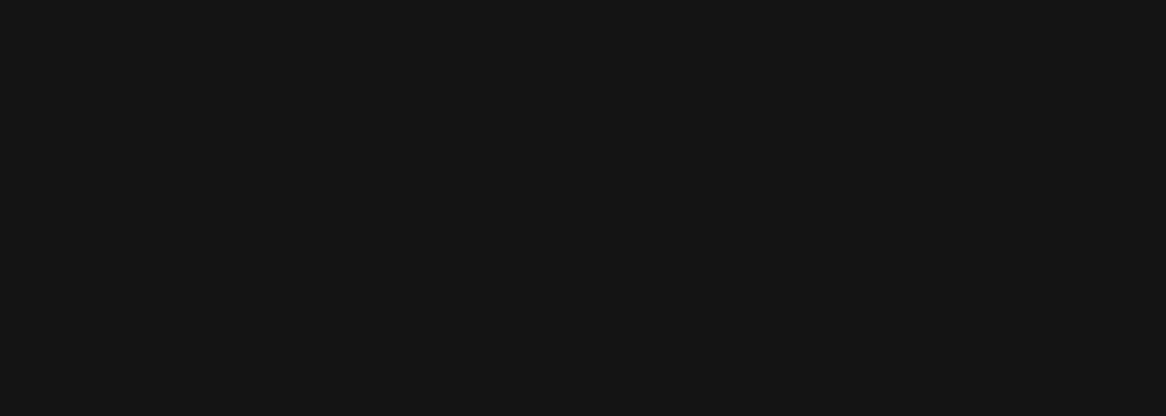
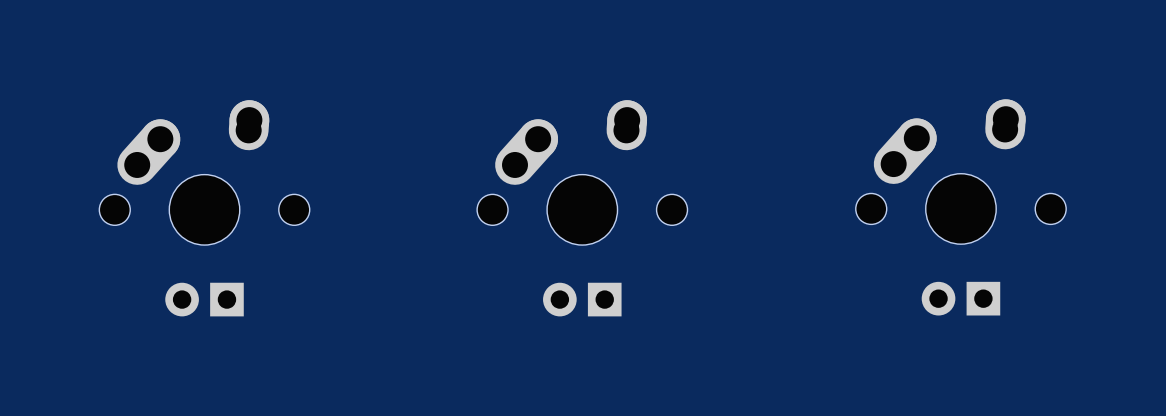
part: none -> (960, 207)
part: none -> (204, 208)
part: none -> (582, 208)

